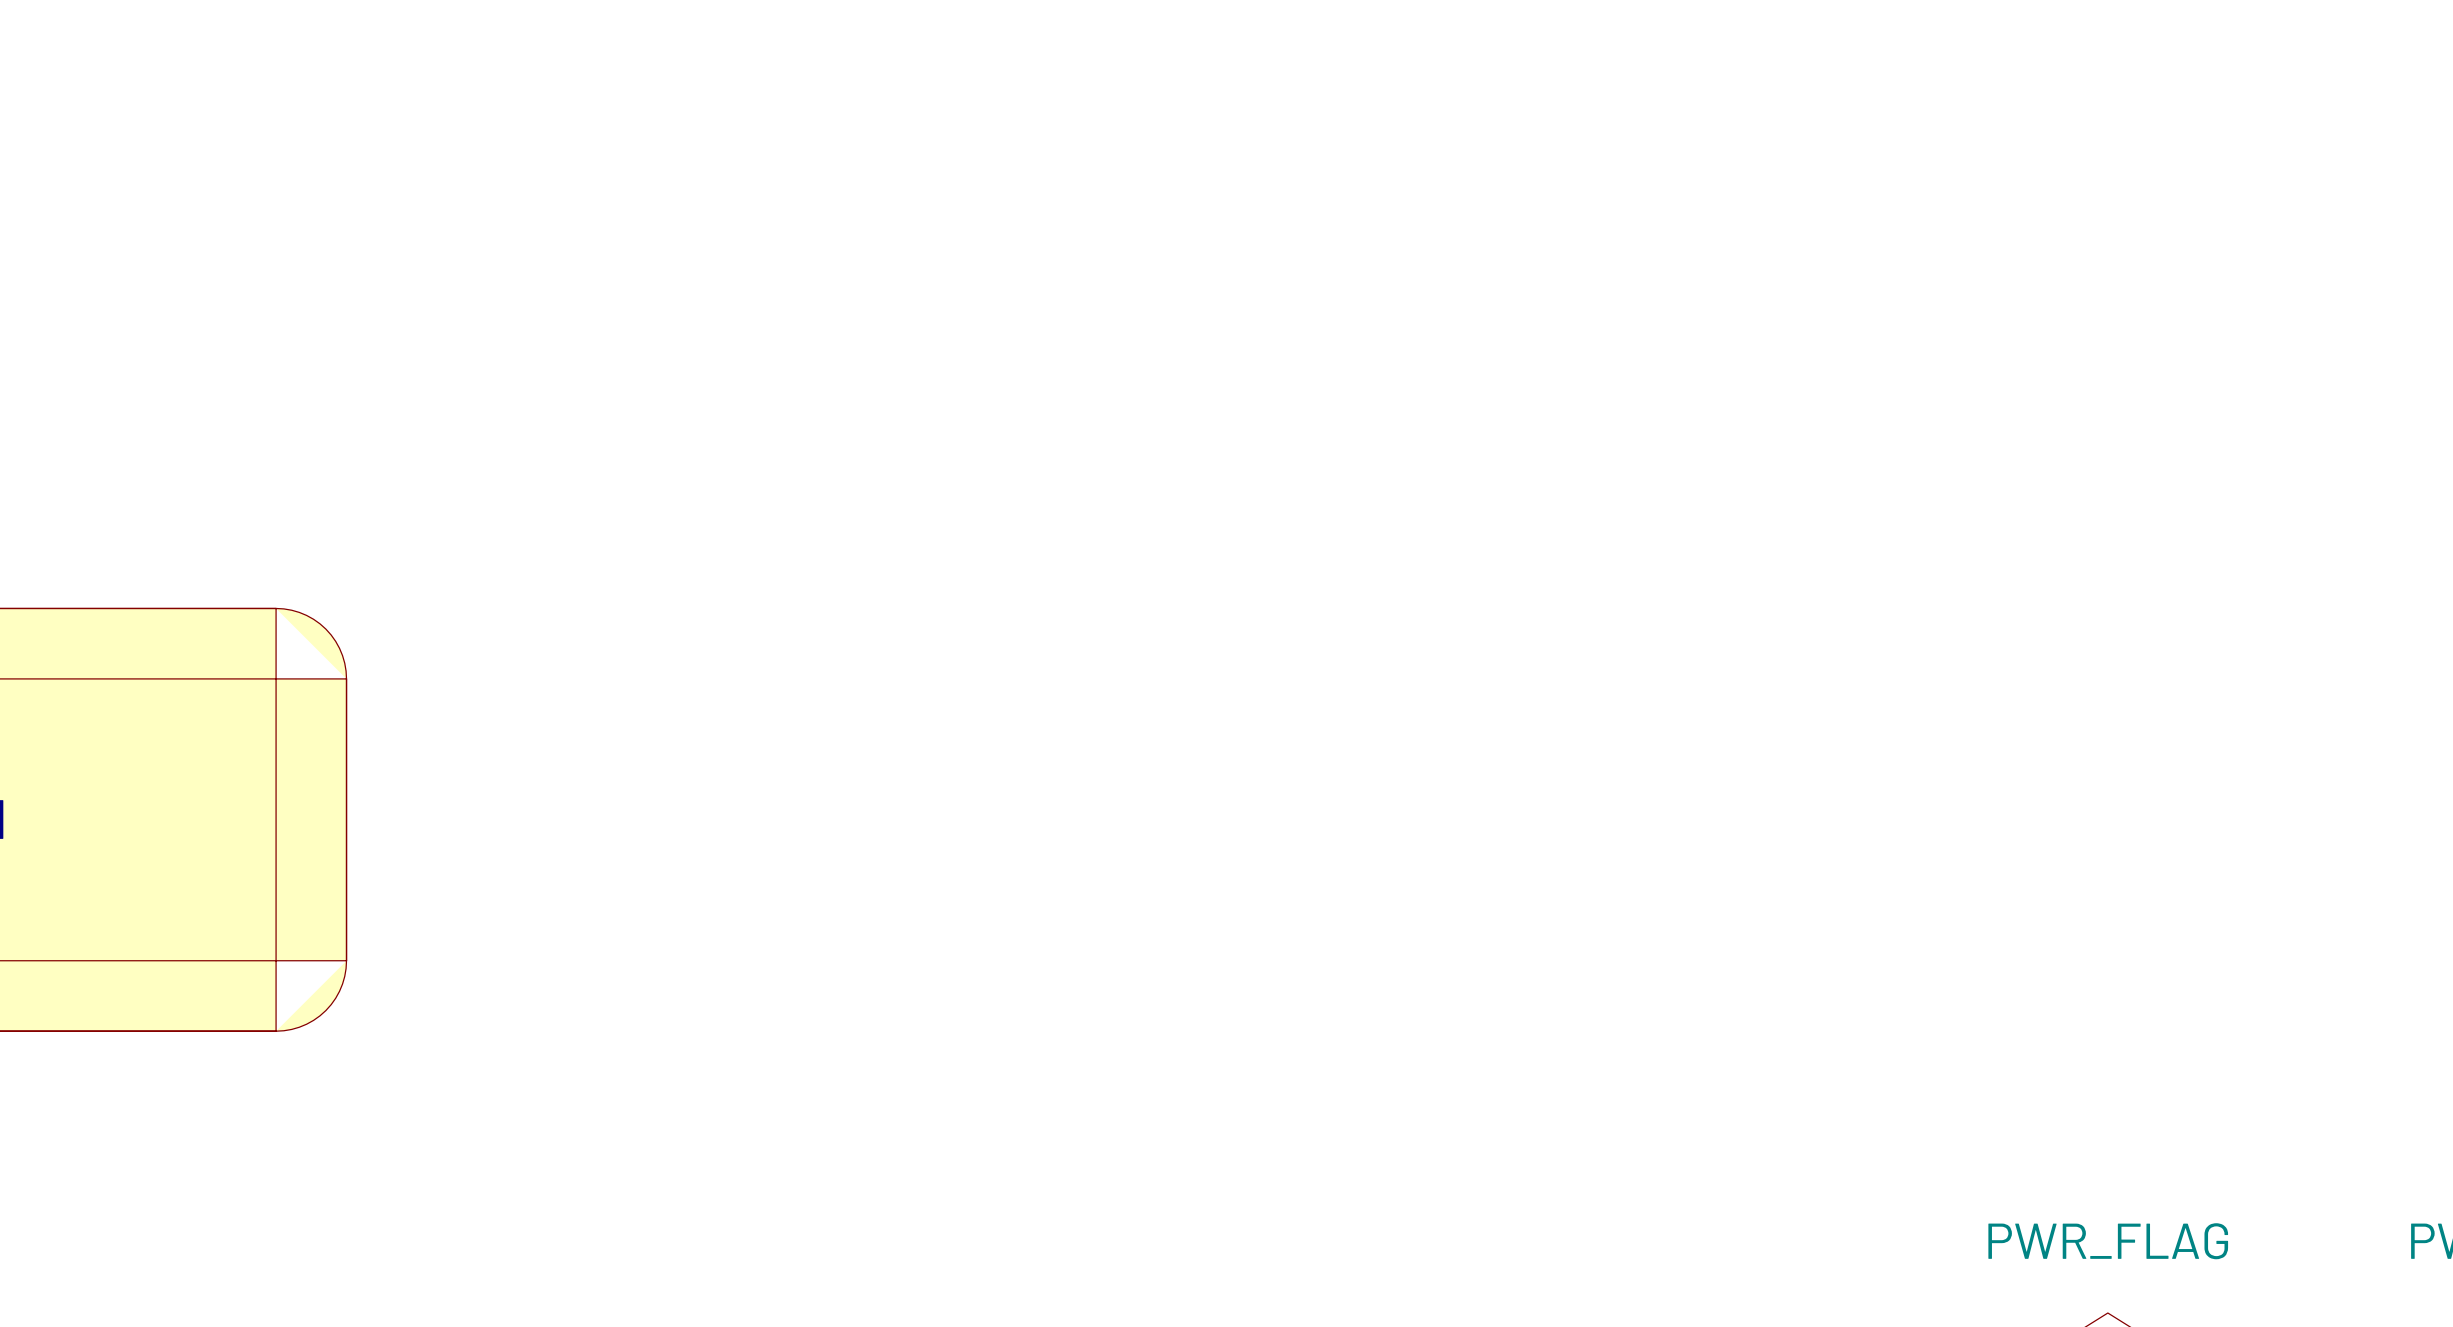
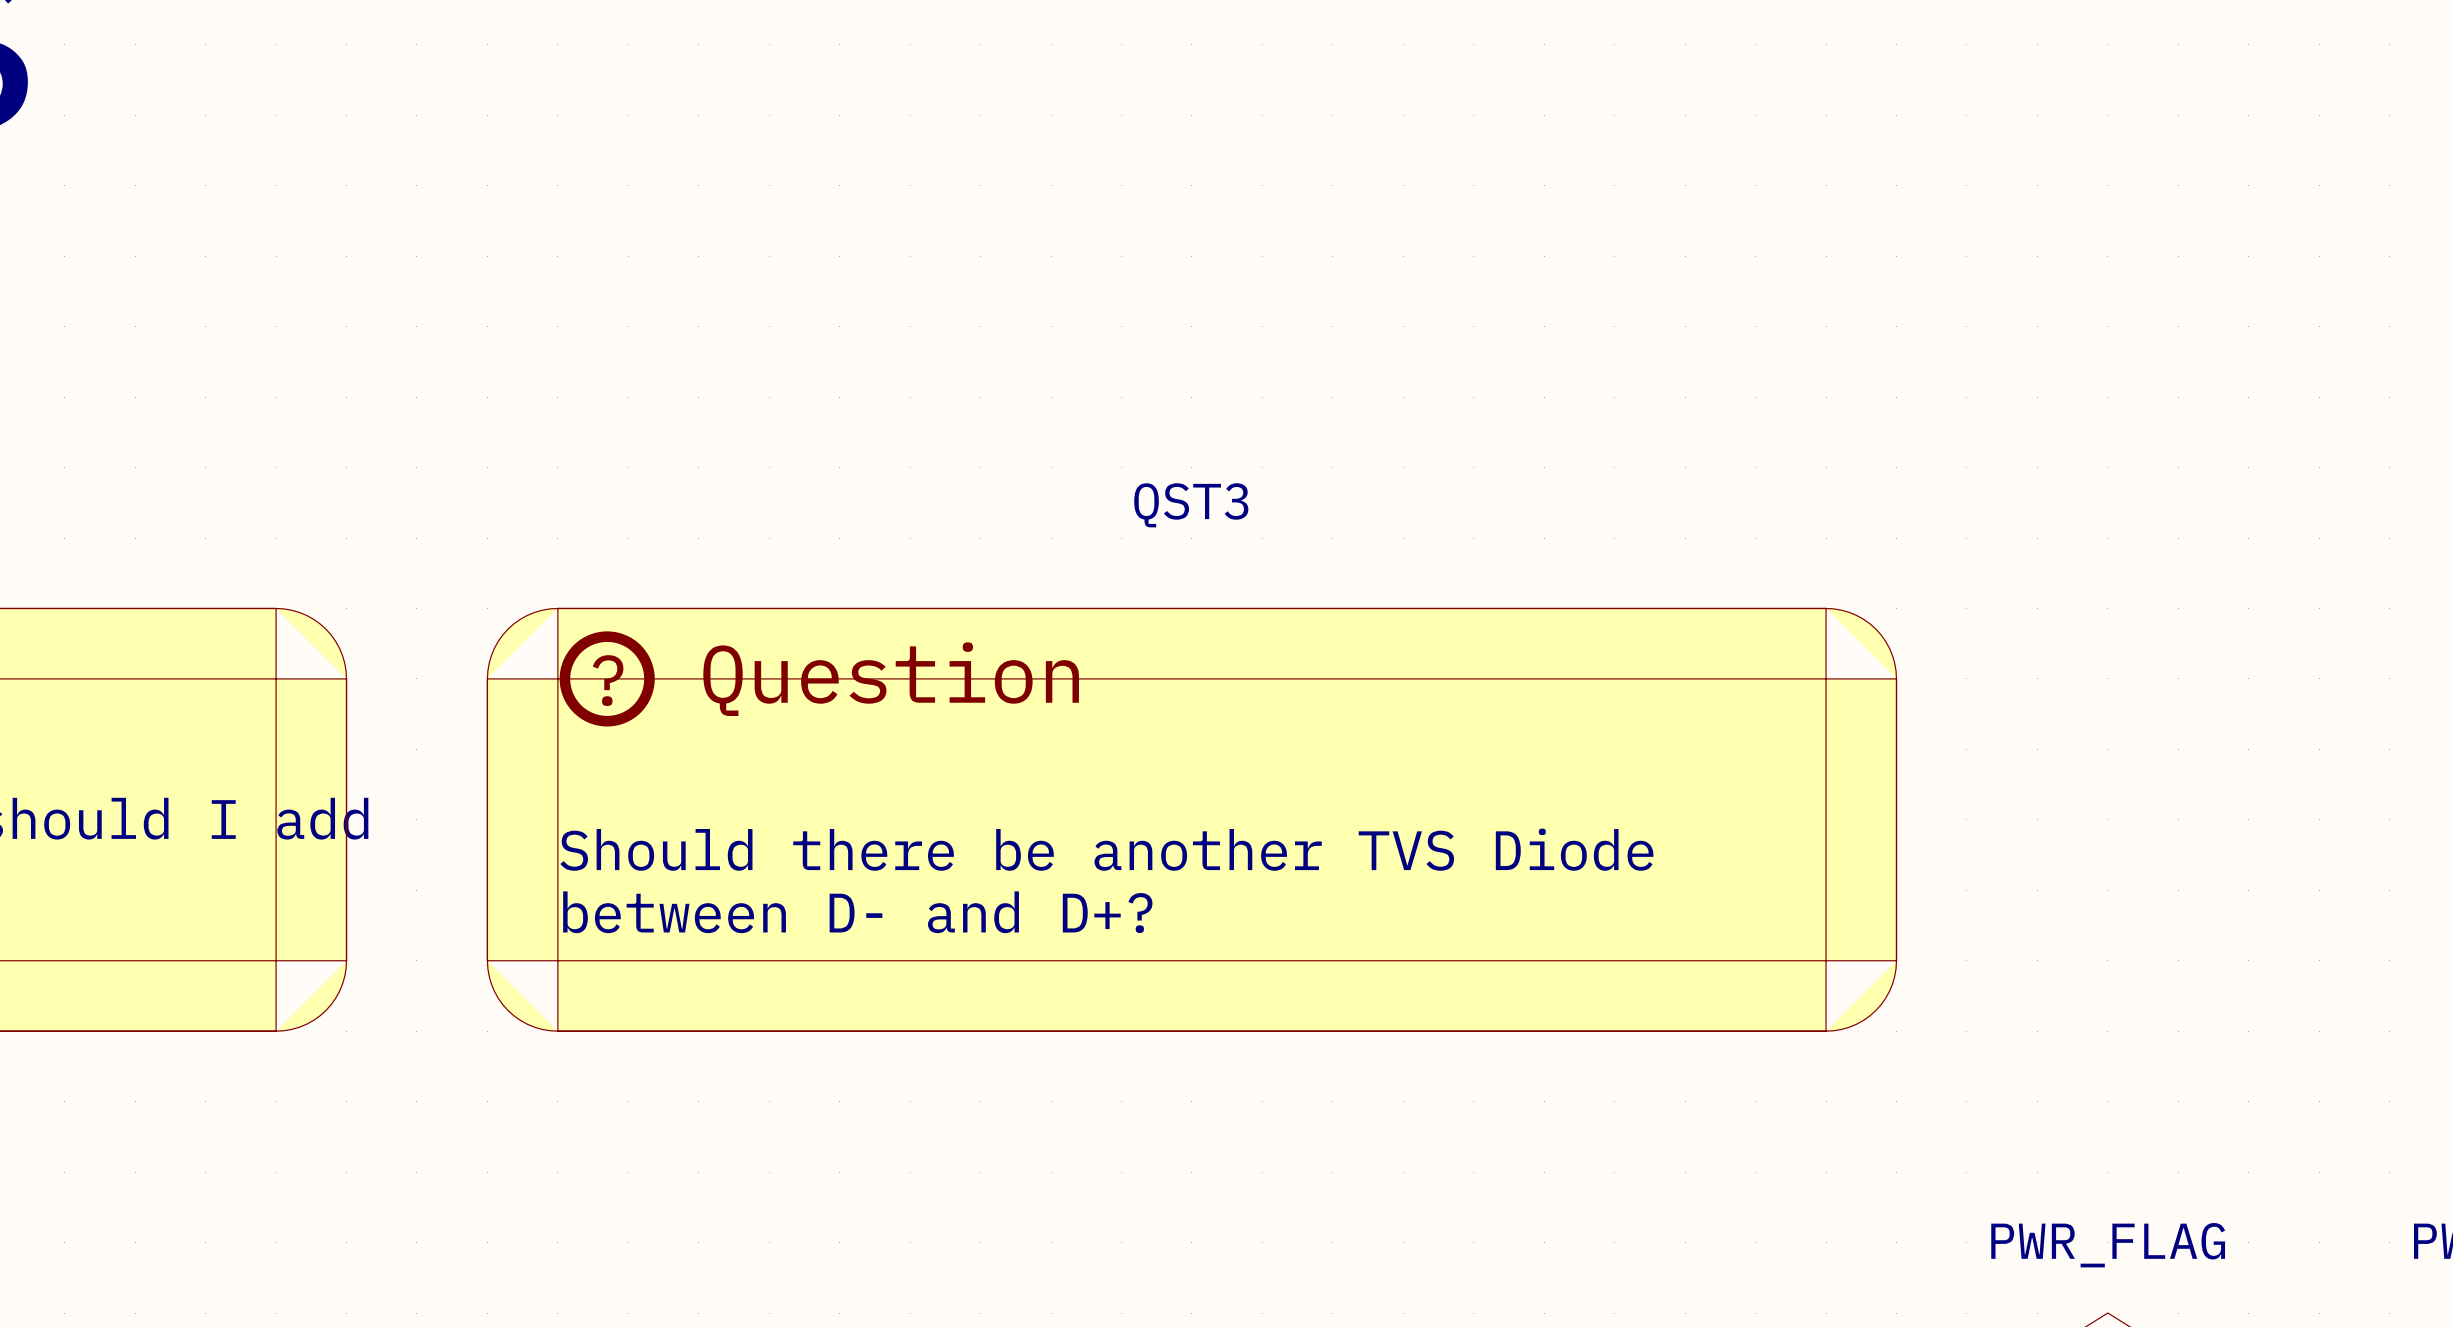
QST3: none -> (1191, 819)
text: none -> Should there be another TVS Diode (1106, 849)
text: none -> between D- and D+? (857, 912)

